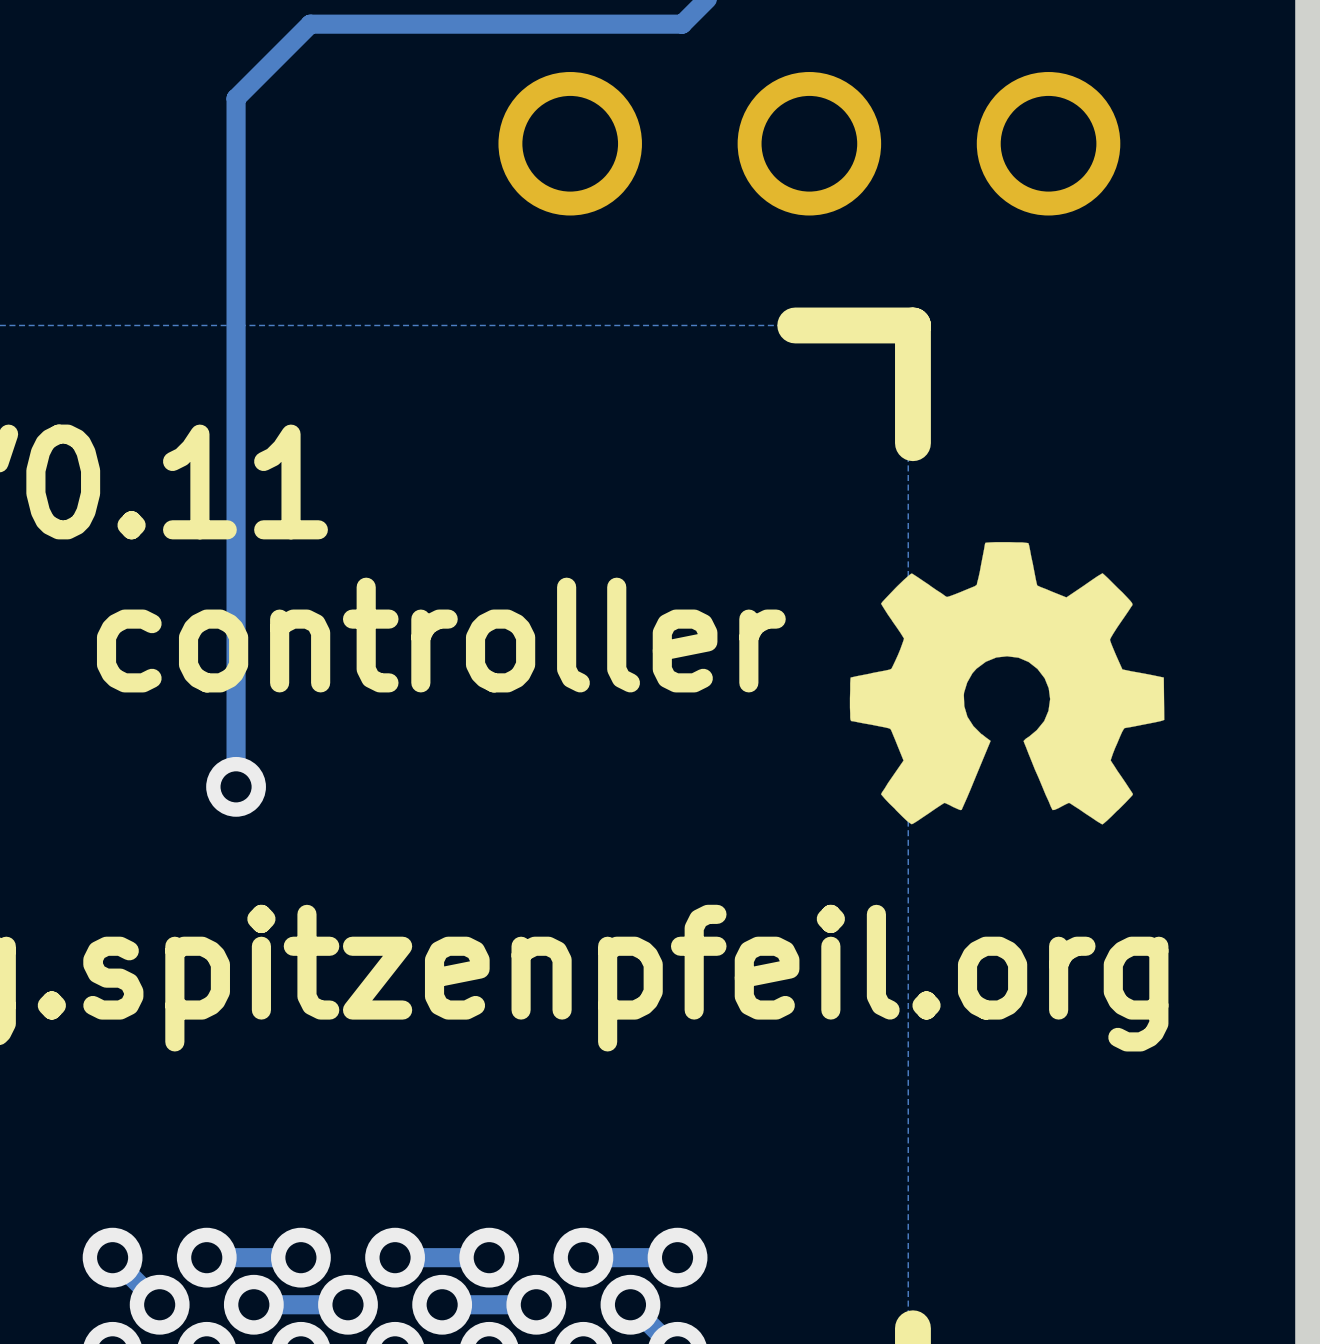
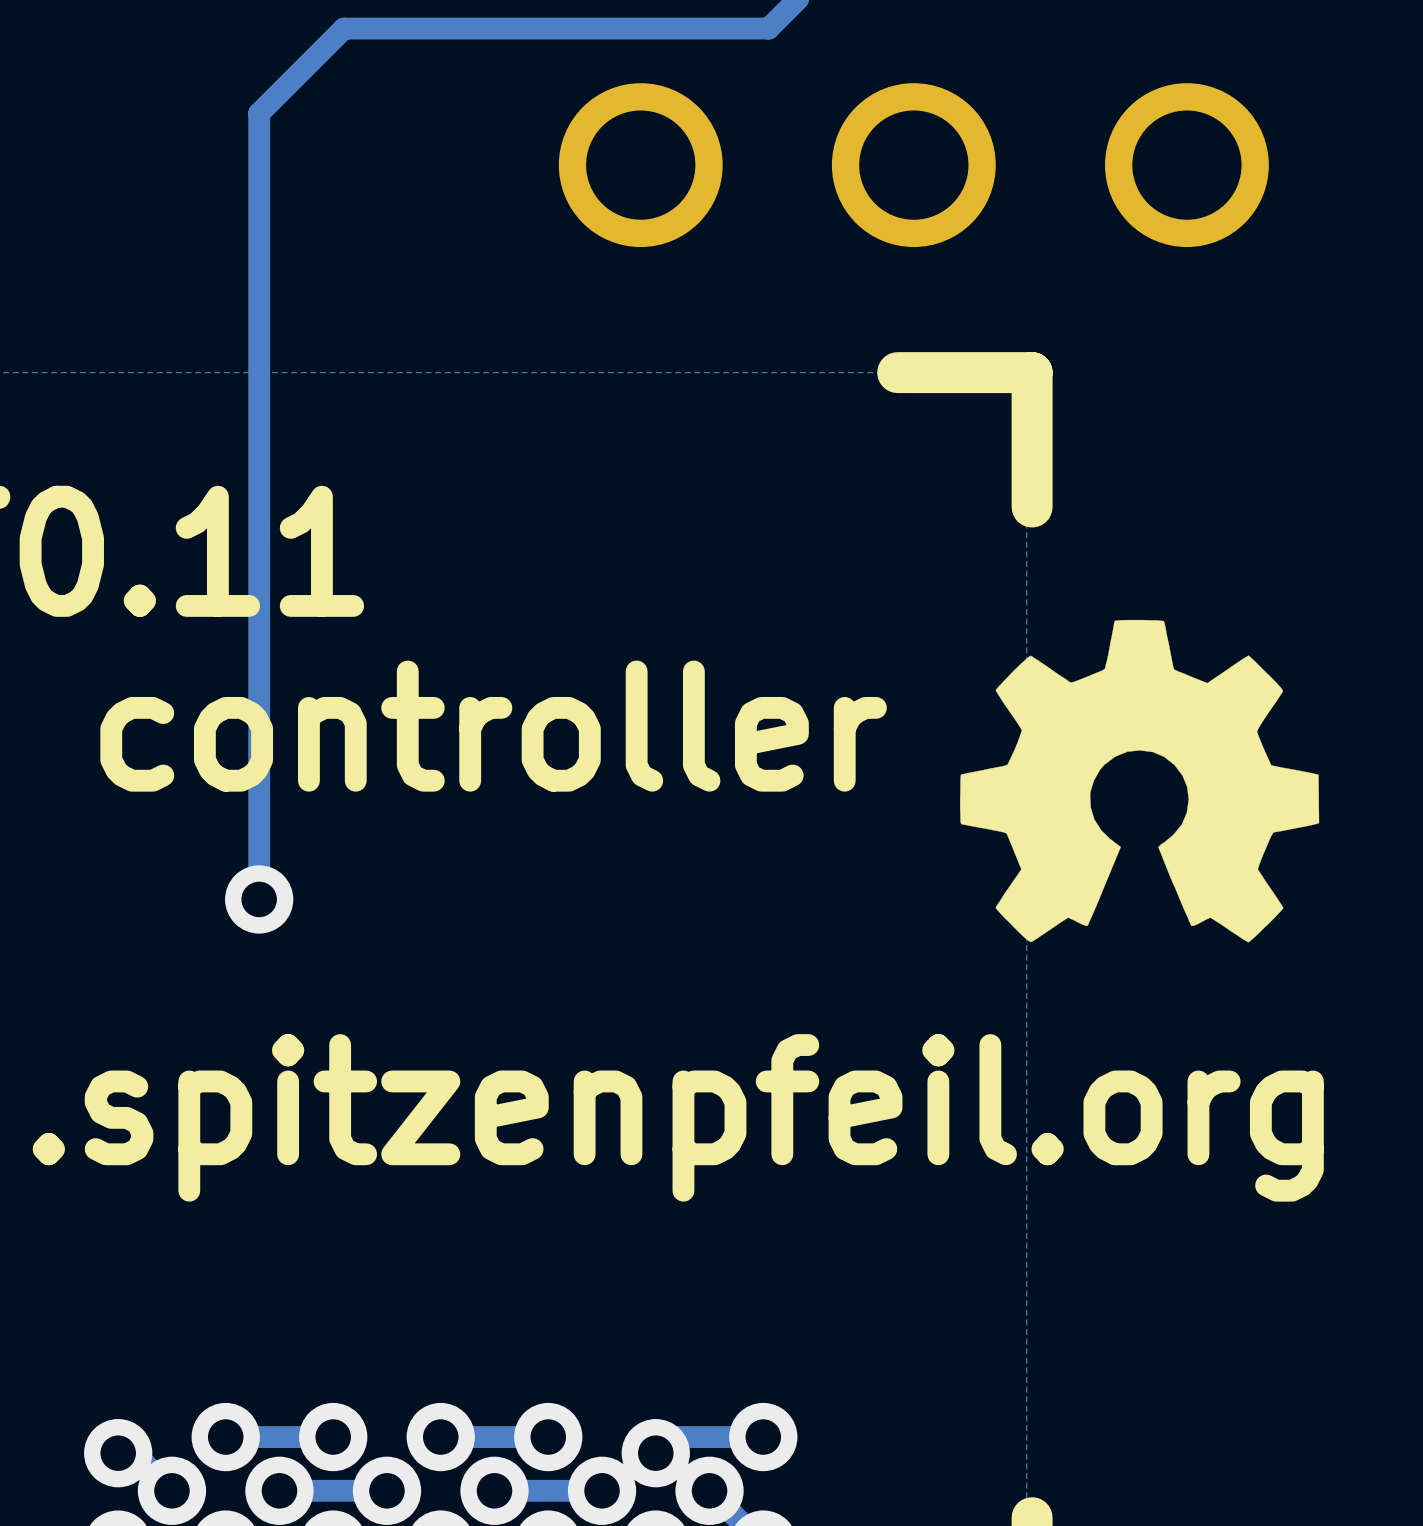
via position: (112, 1257) -> (118, 1453)
via position: (583, 1257) -> (655, 1453)

